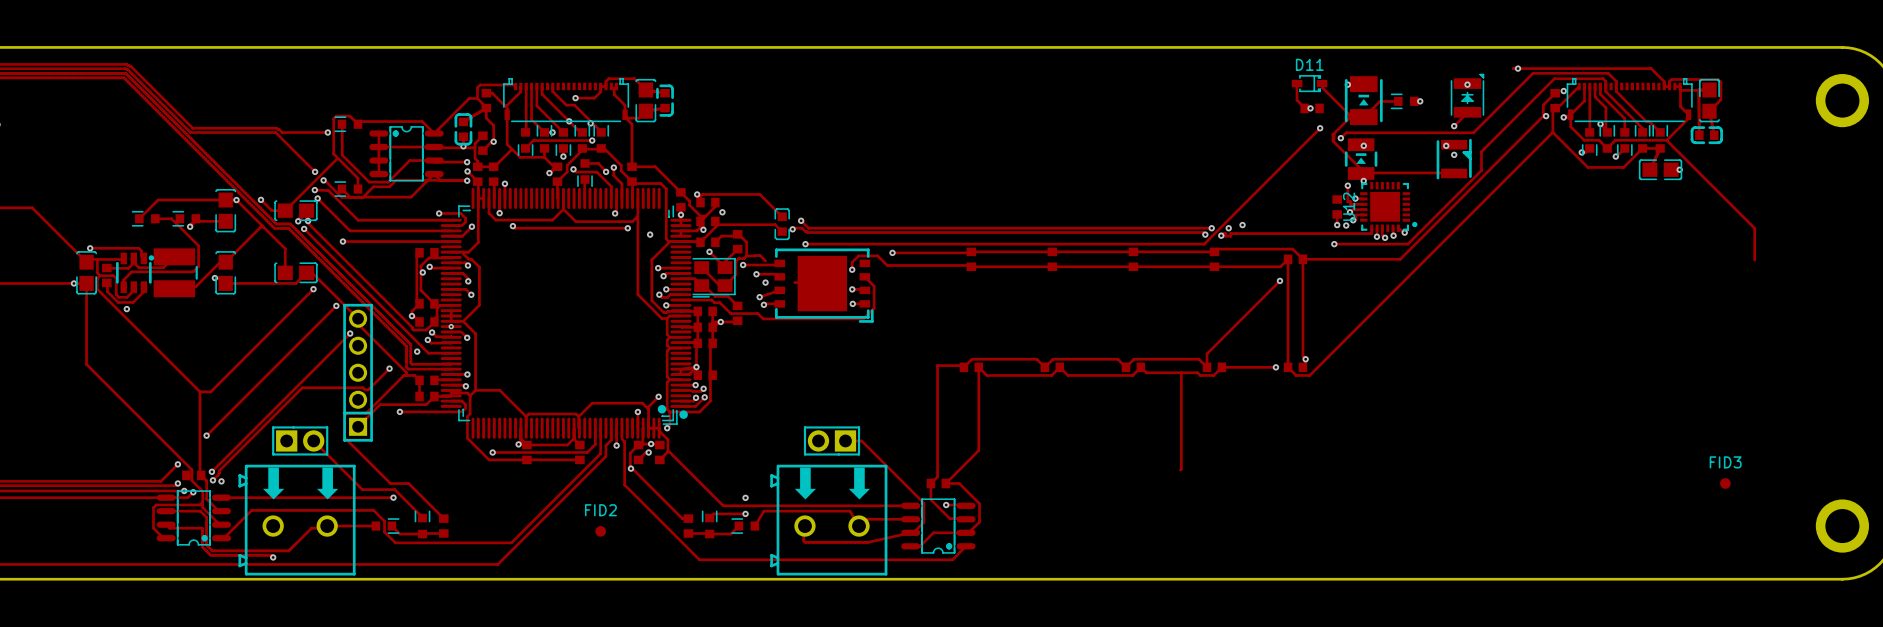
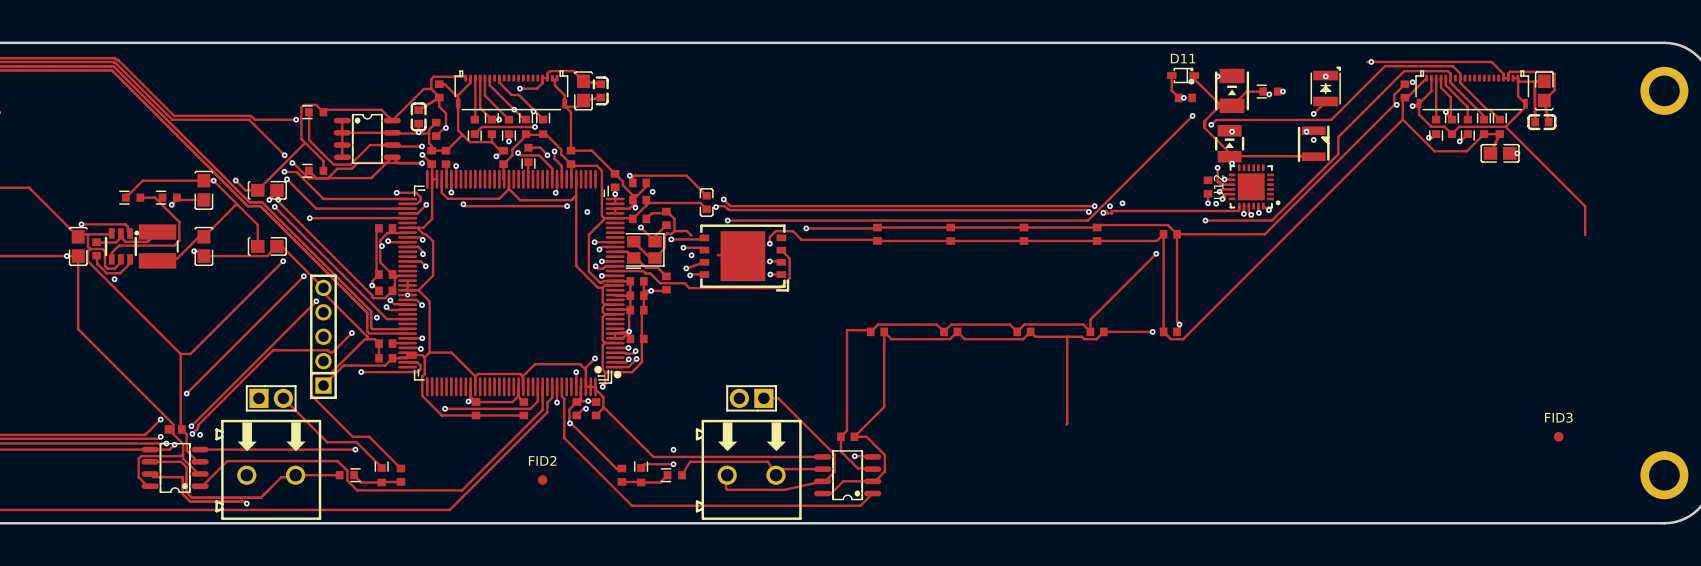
via: none -> (1191, 81)
via: none -> (1269, 94)

